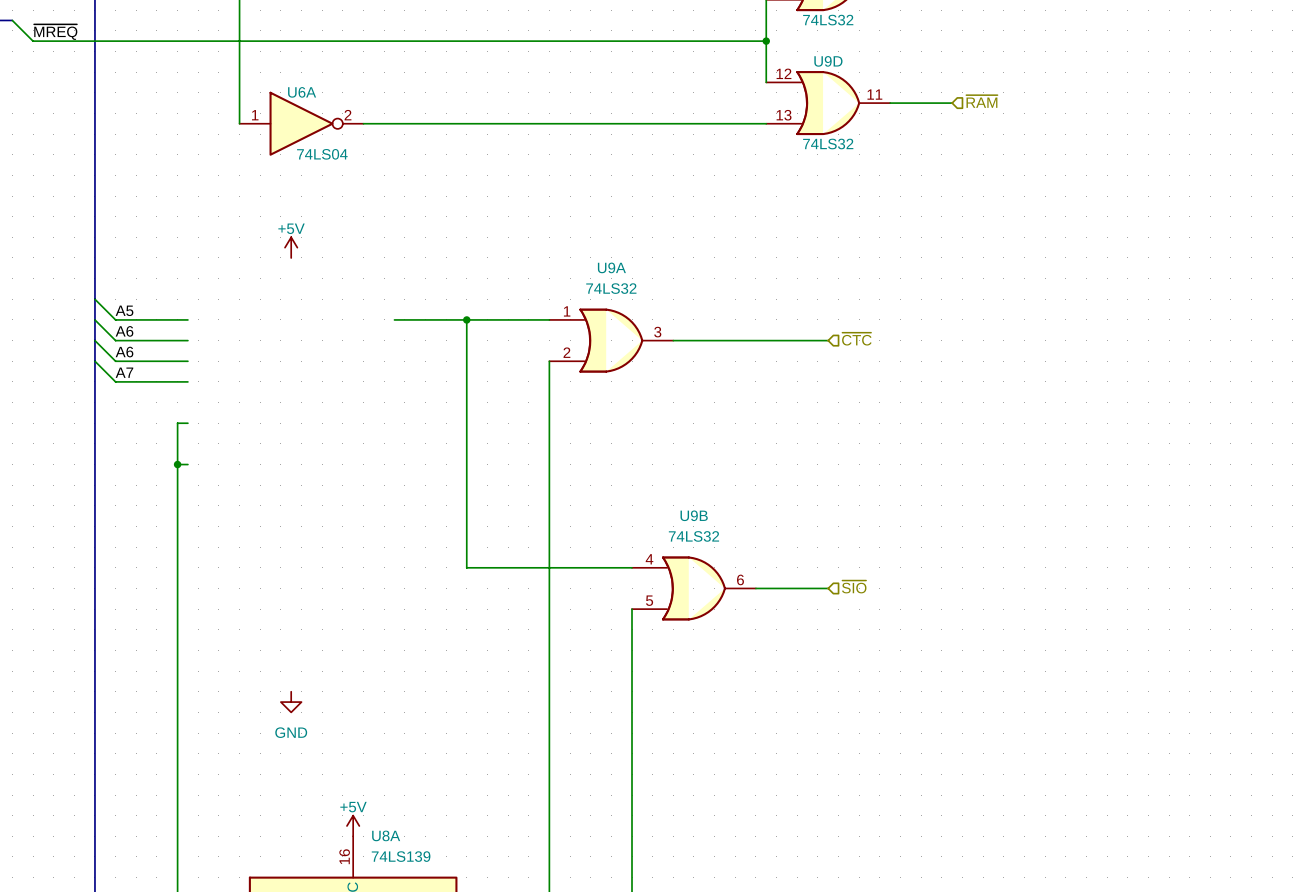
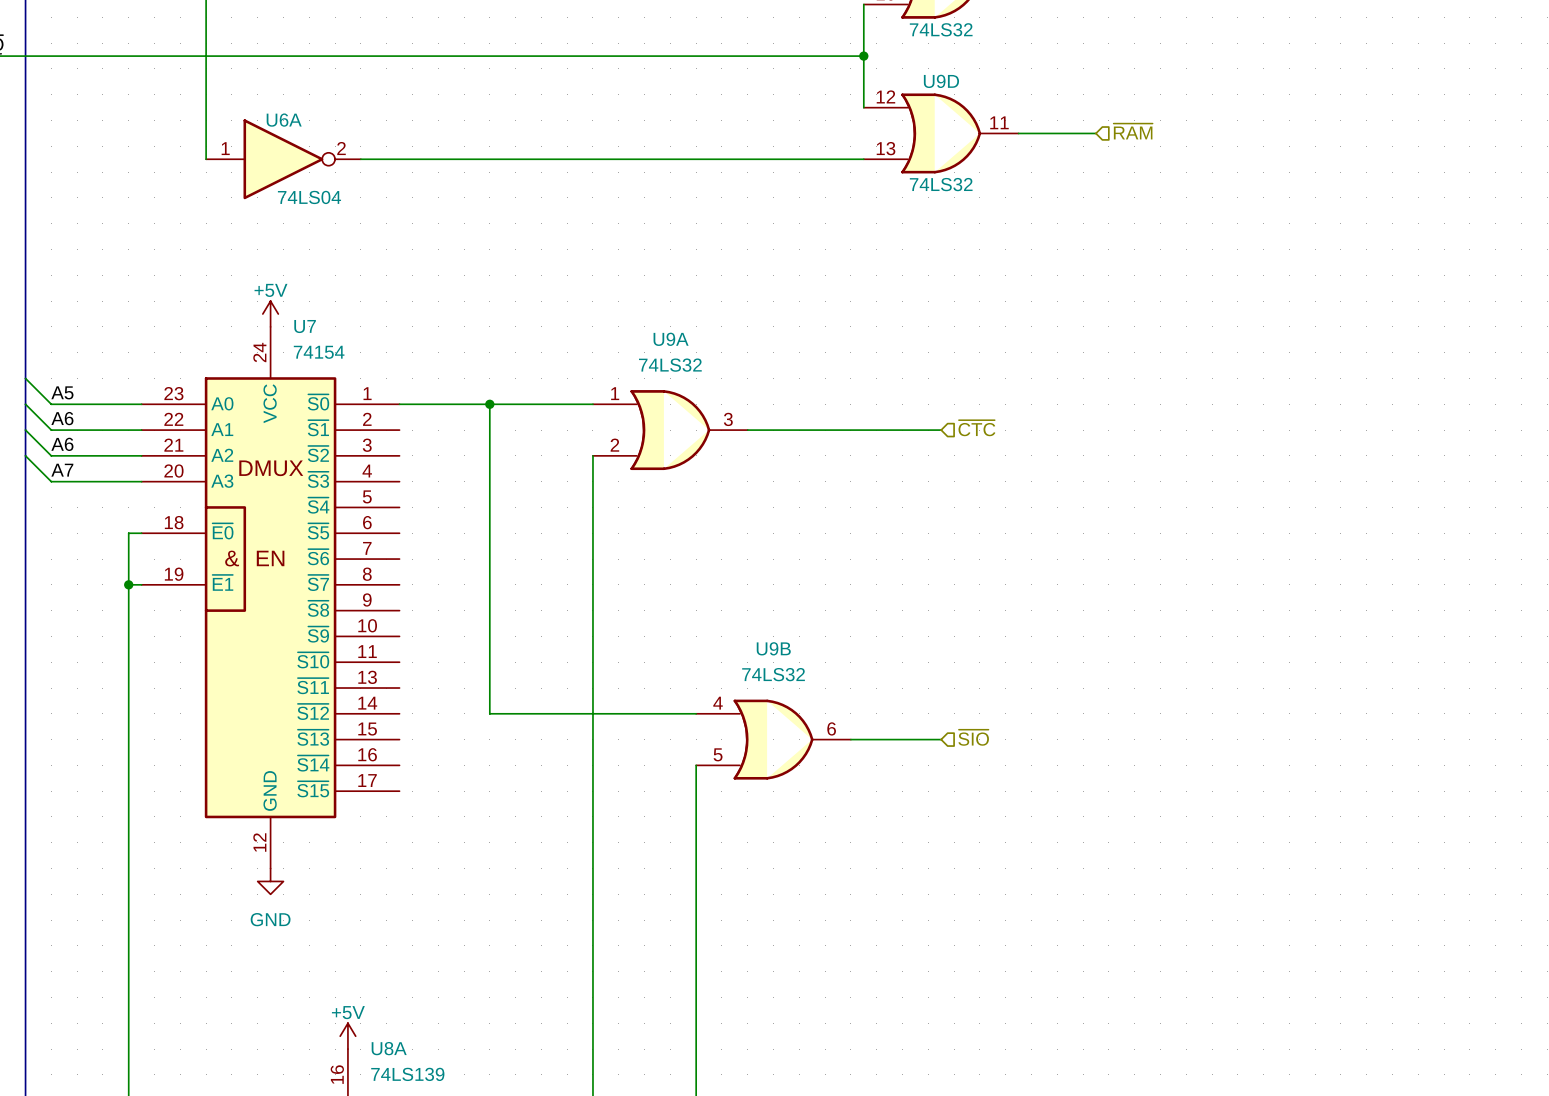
U7: none -> 74154 (270, 597)

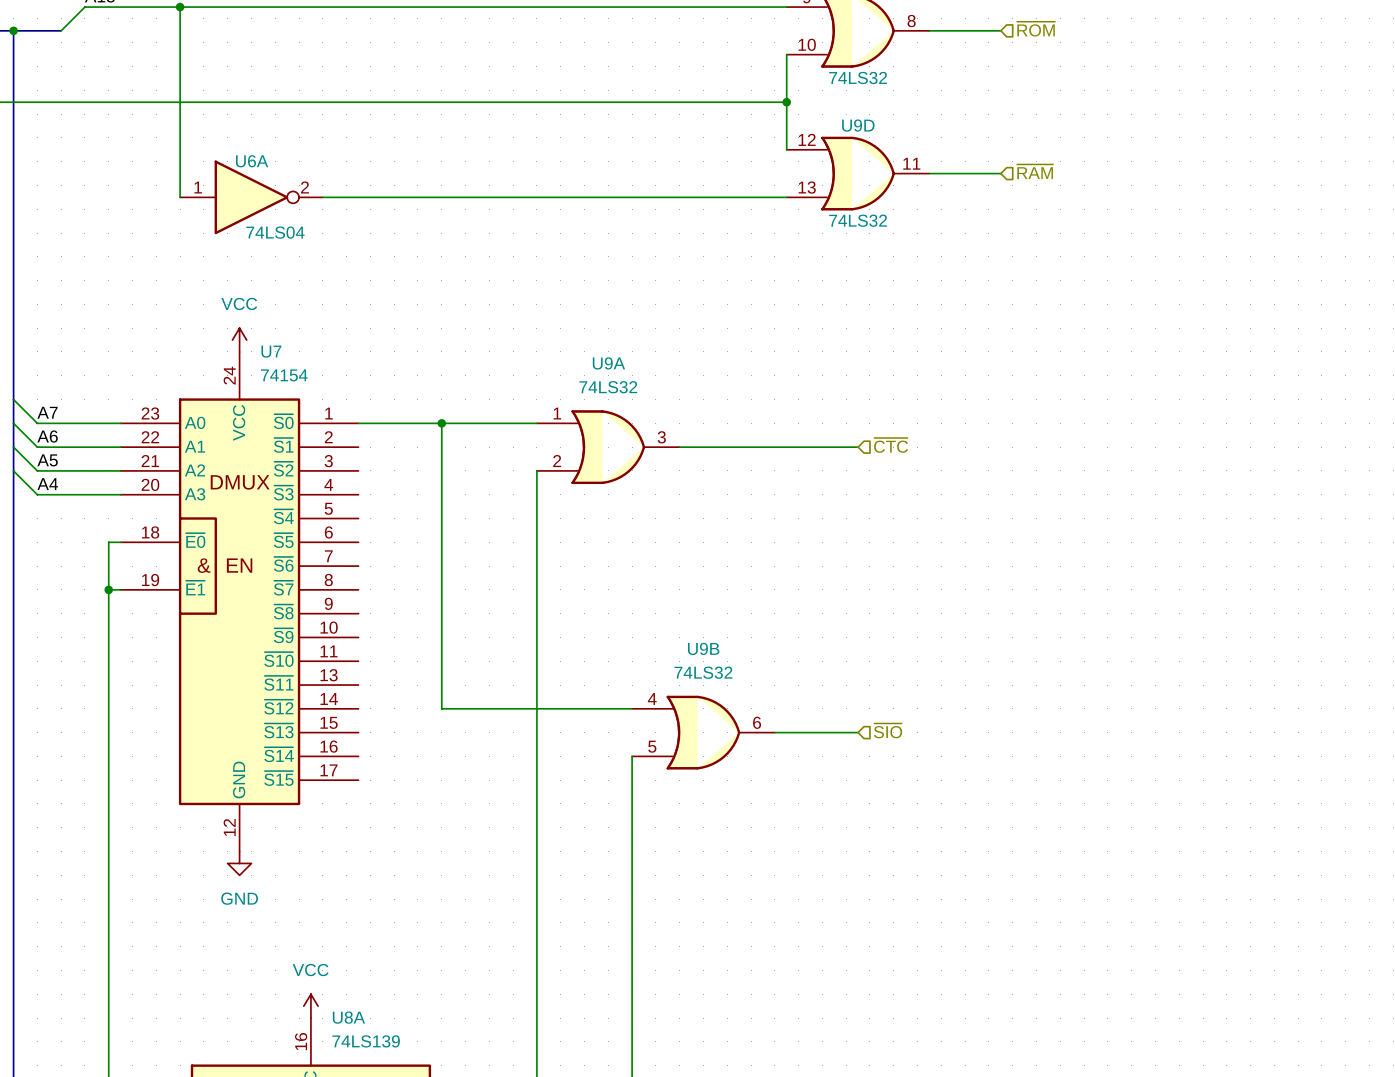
power symbol: +5V (270, 314) -> VCC (239, 340)
label: A5 (62, 392) -> A7 (47, 412)
label: A6 (62, 444) -> A5 (47, 460)
label: A7 (62, 470) -> A4 (47, 484)
power symbol: +5V (347, 1036) -> VCC (310, 1006)

